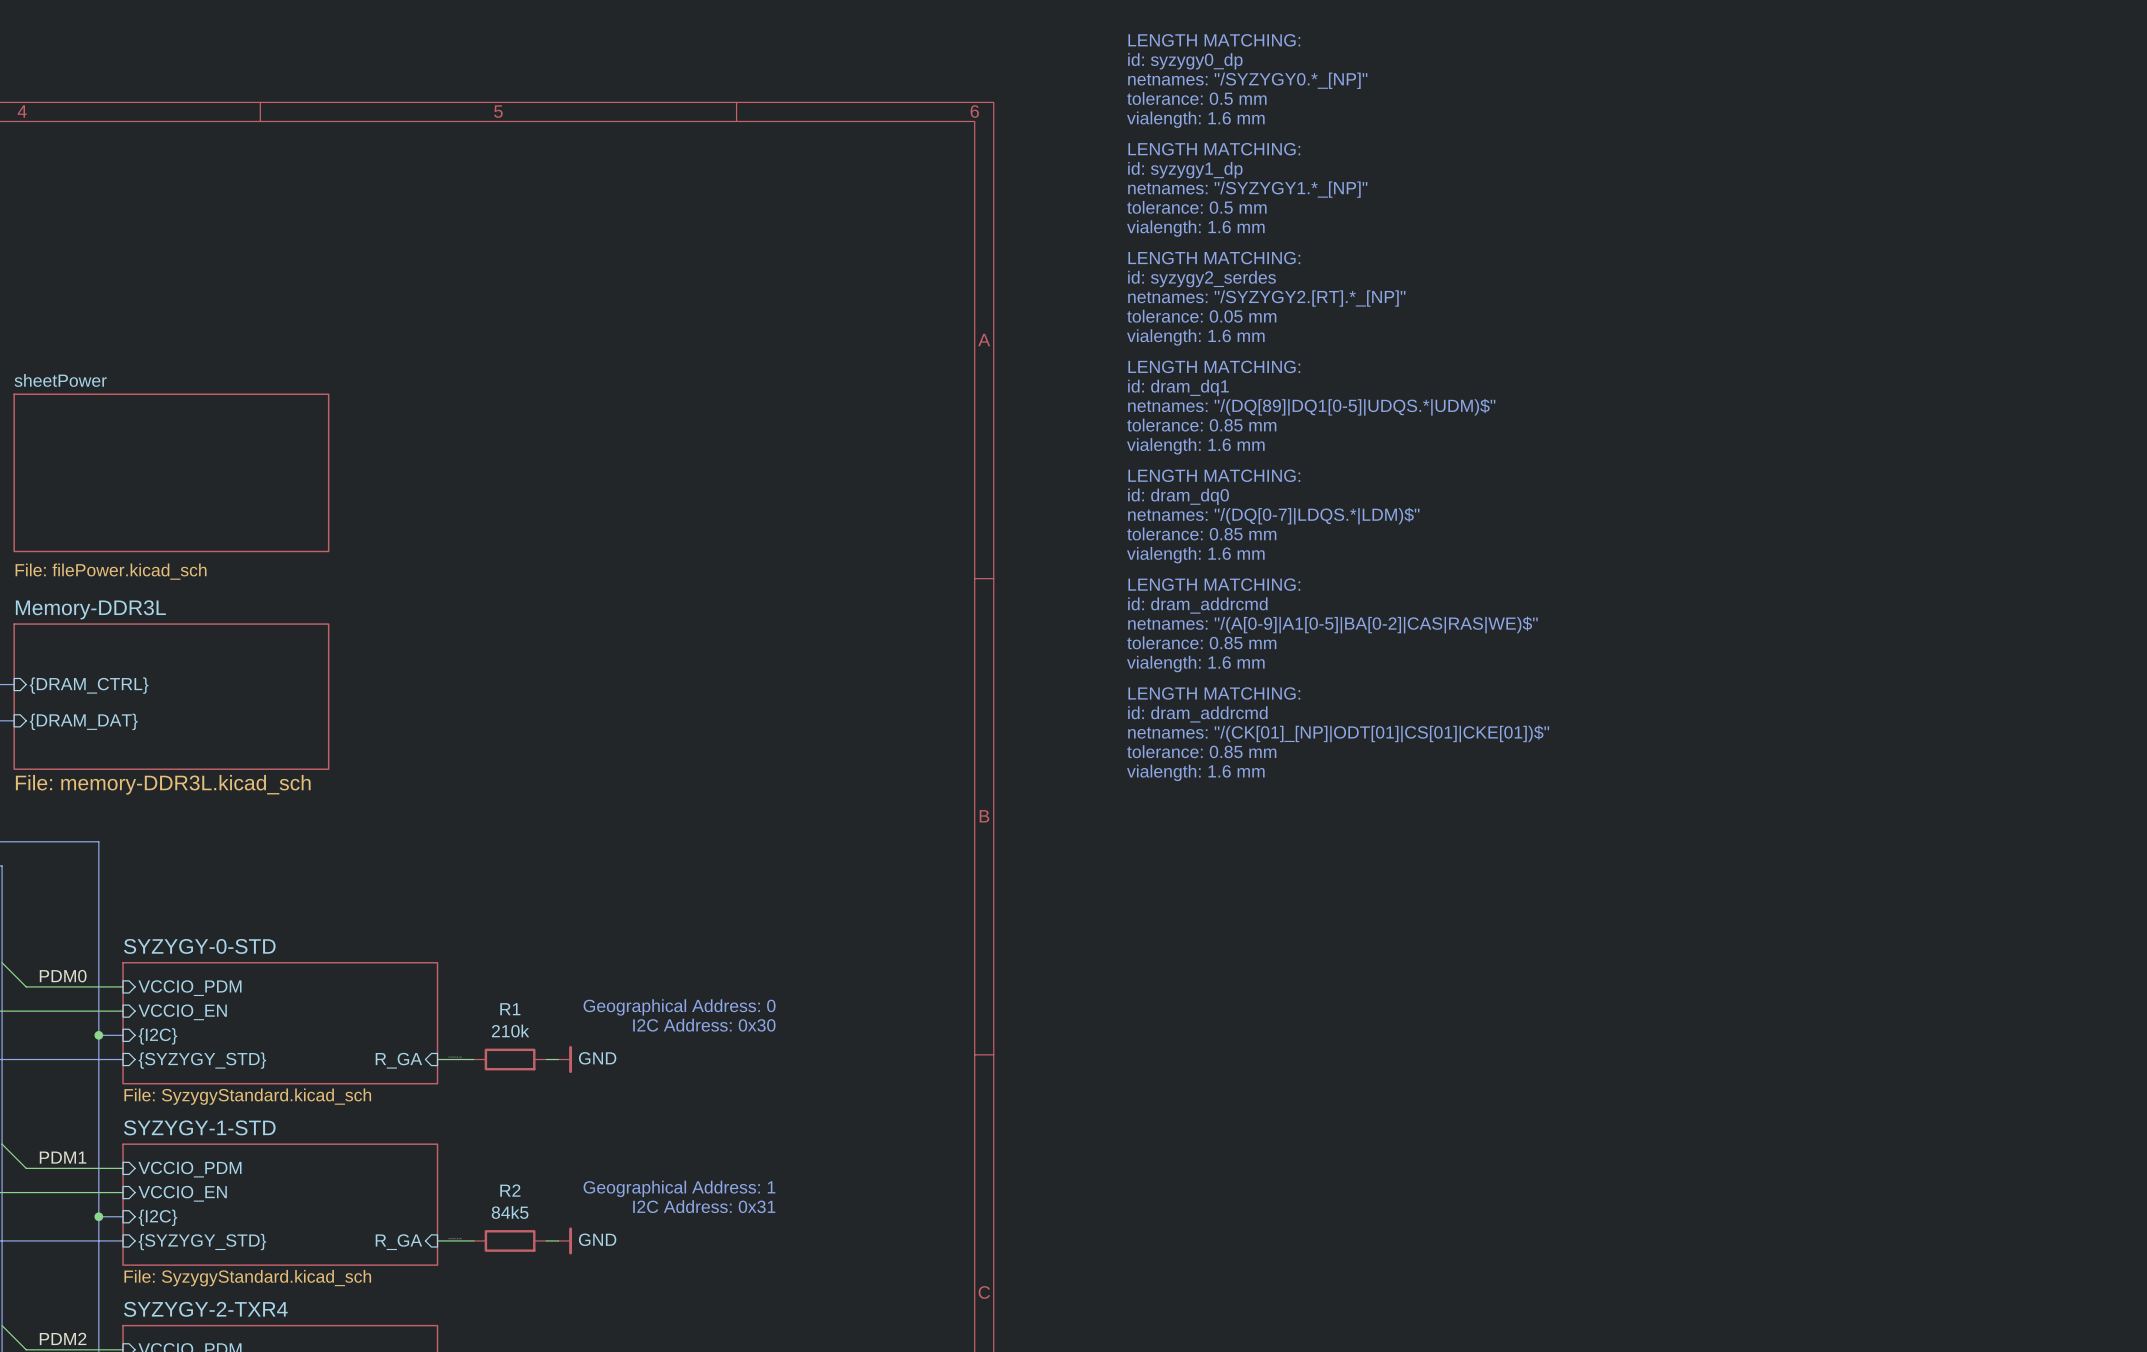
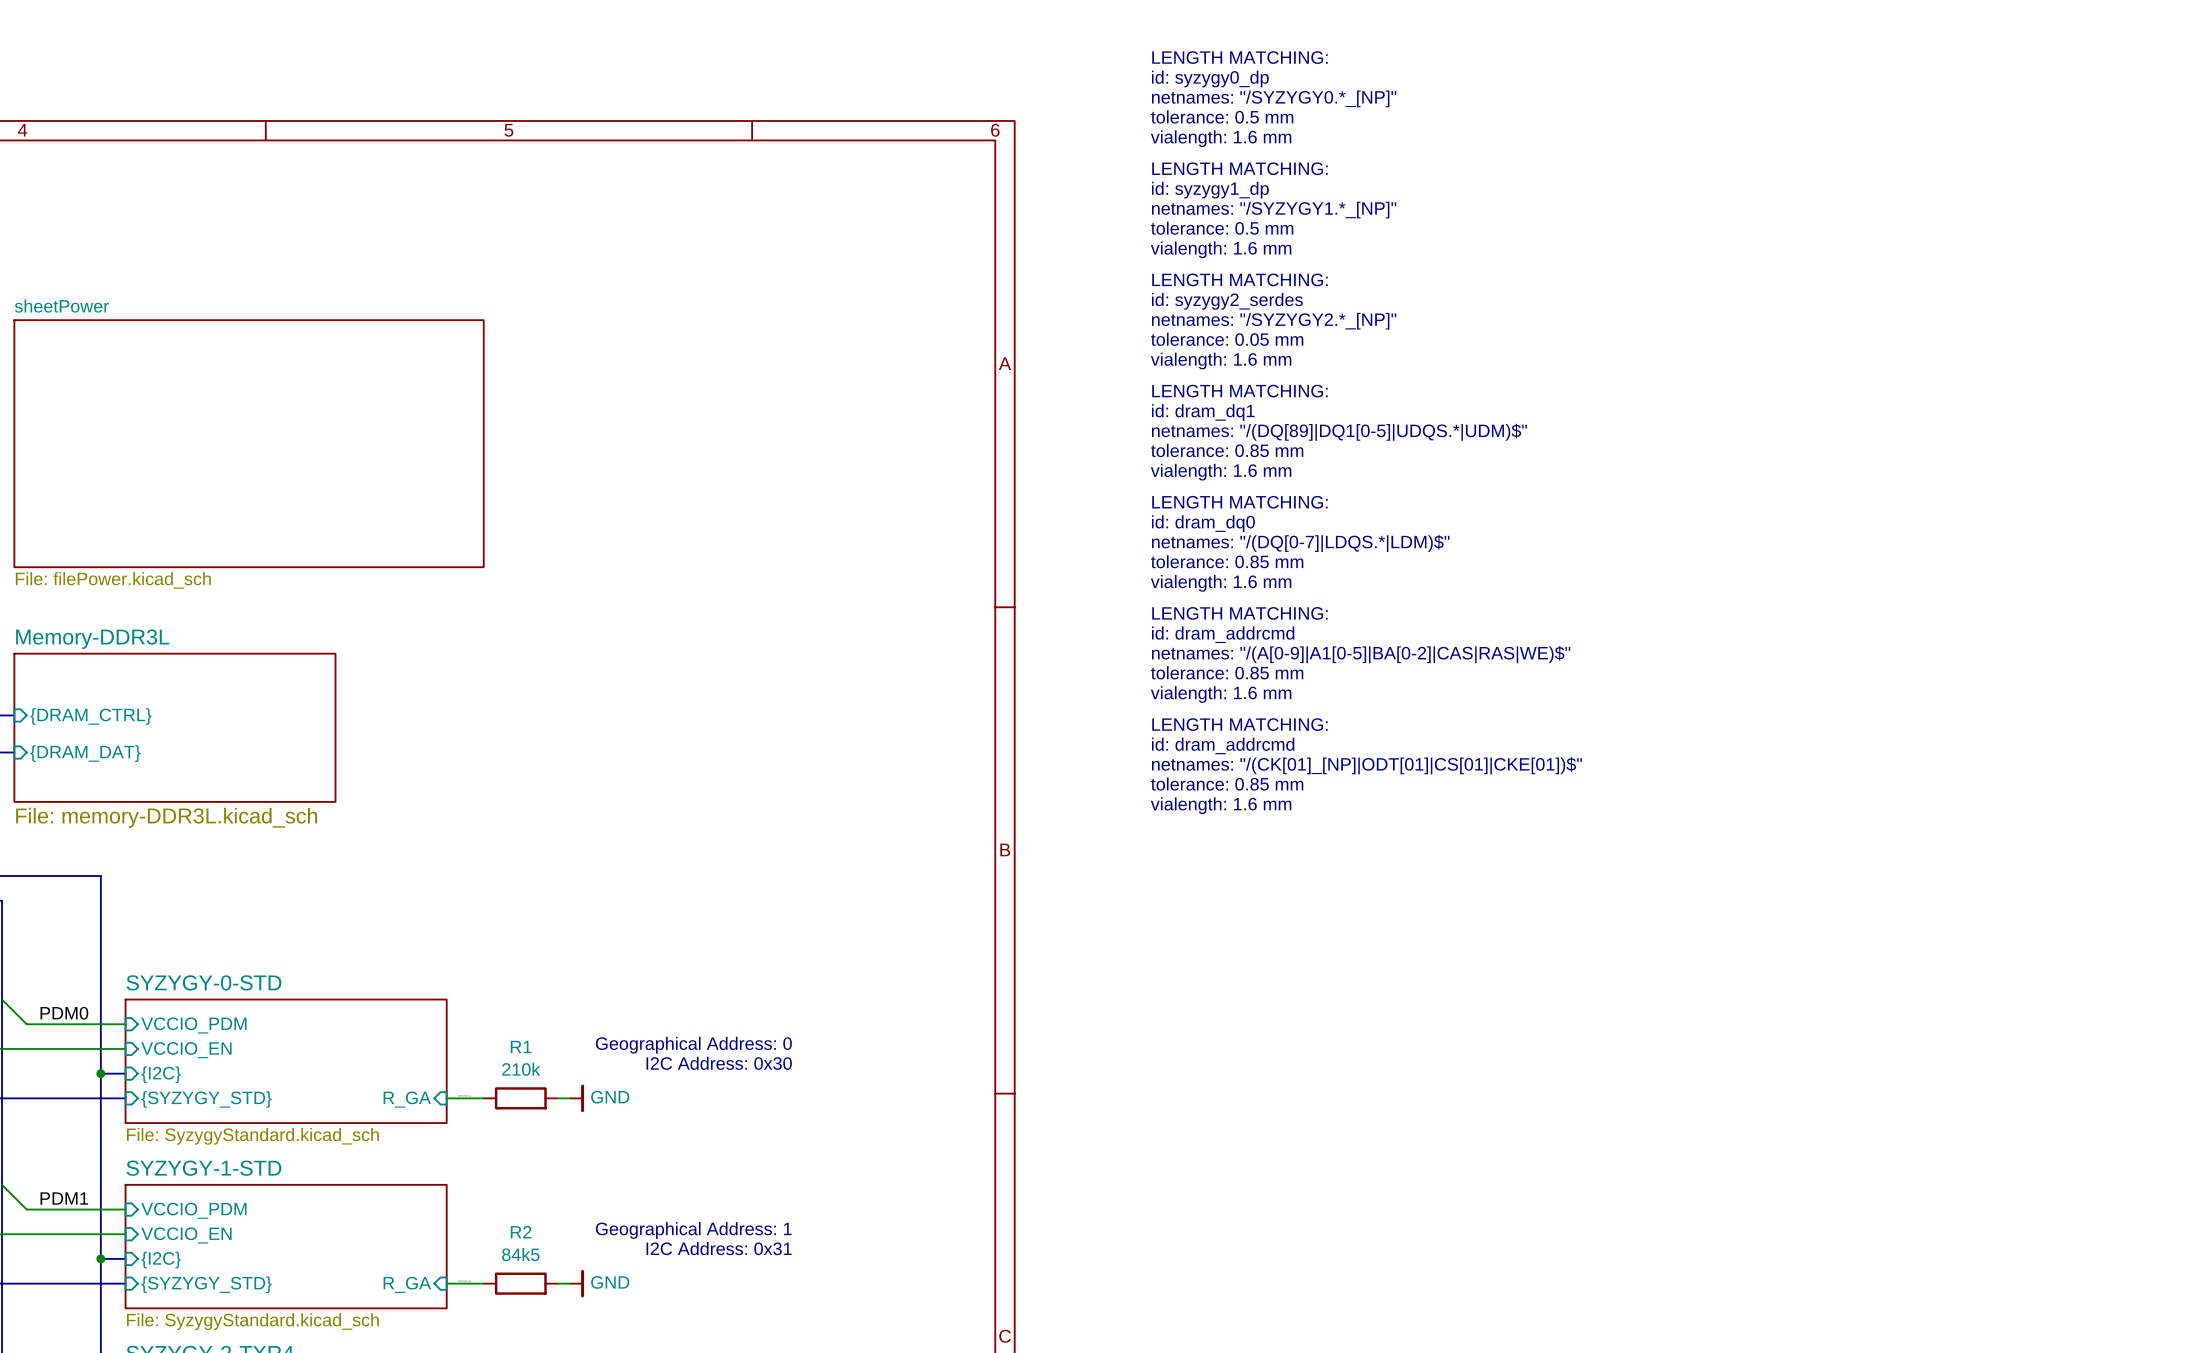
text: netnames: "/SYZYGY2.[RT].*_[NP]" (1266, 298) -> netnames: "/SYZYGY2.*_[NP]" (1274, 321)
sheet sheetPower: none -> File: filePower.kicad_sch (249, 443)
sheet sheetPower: File: filePower.kicad_sch (171, 472) -> none

